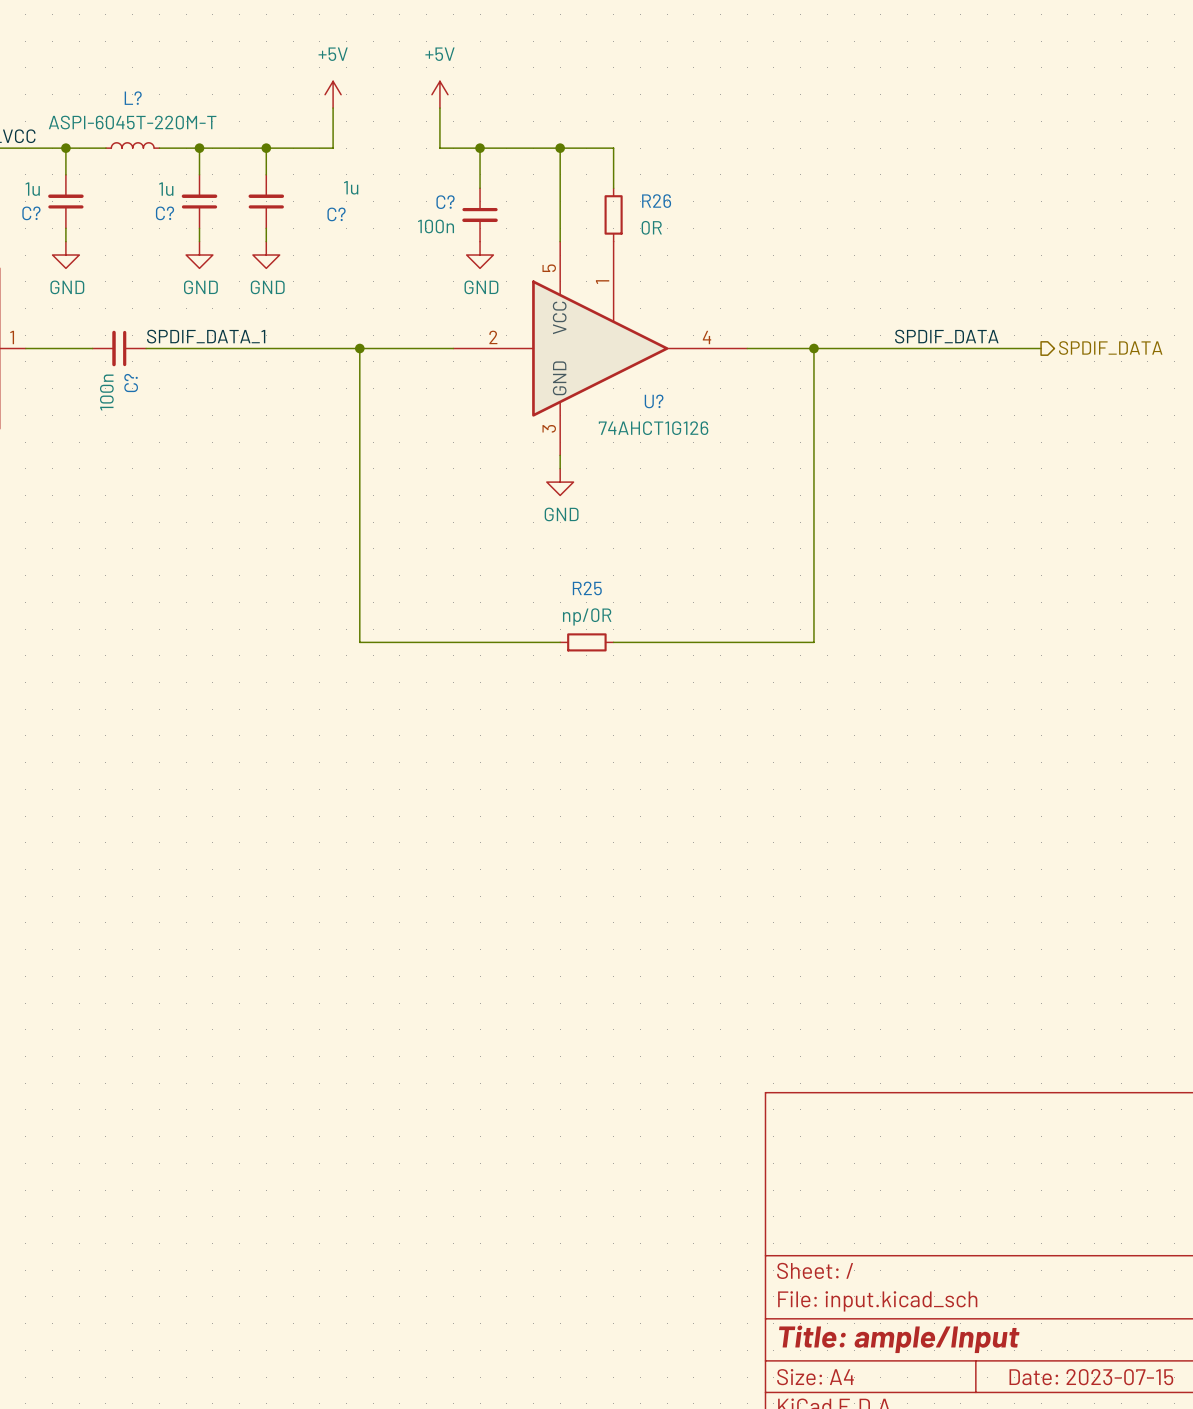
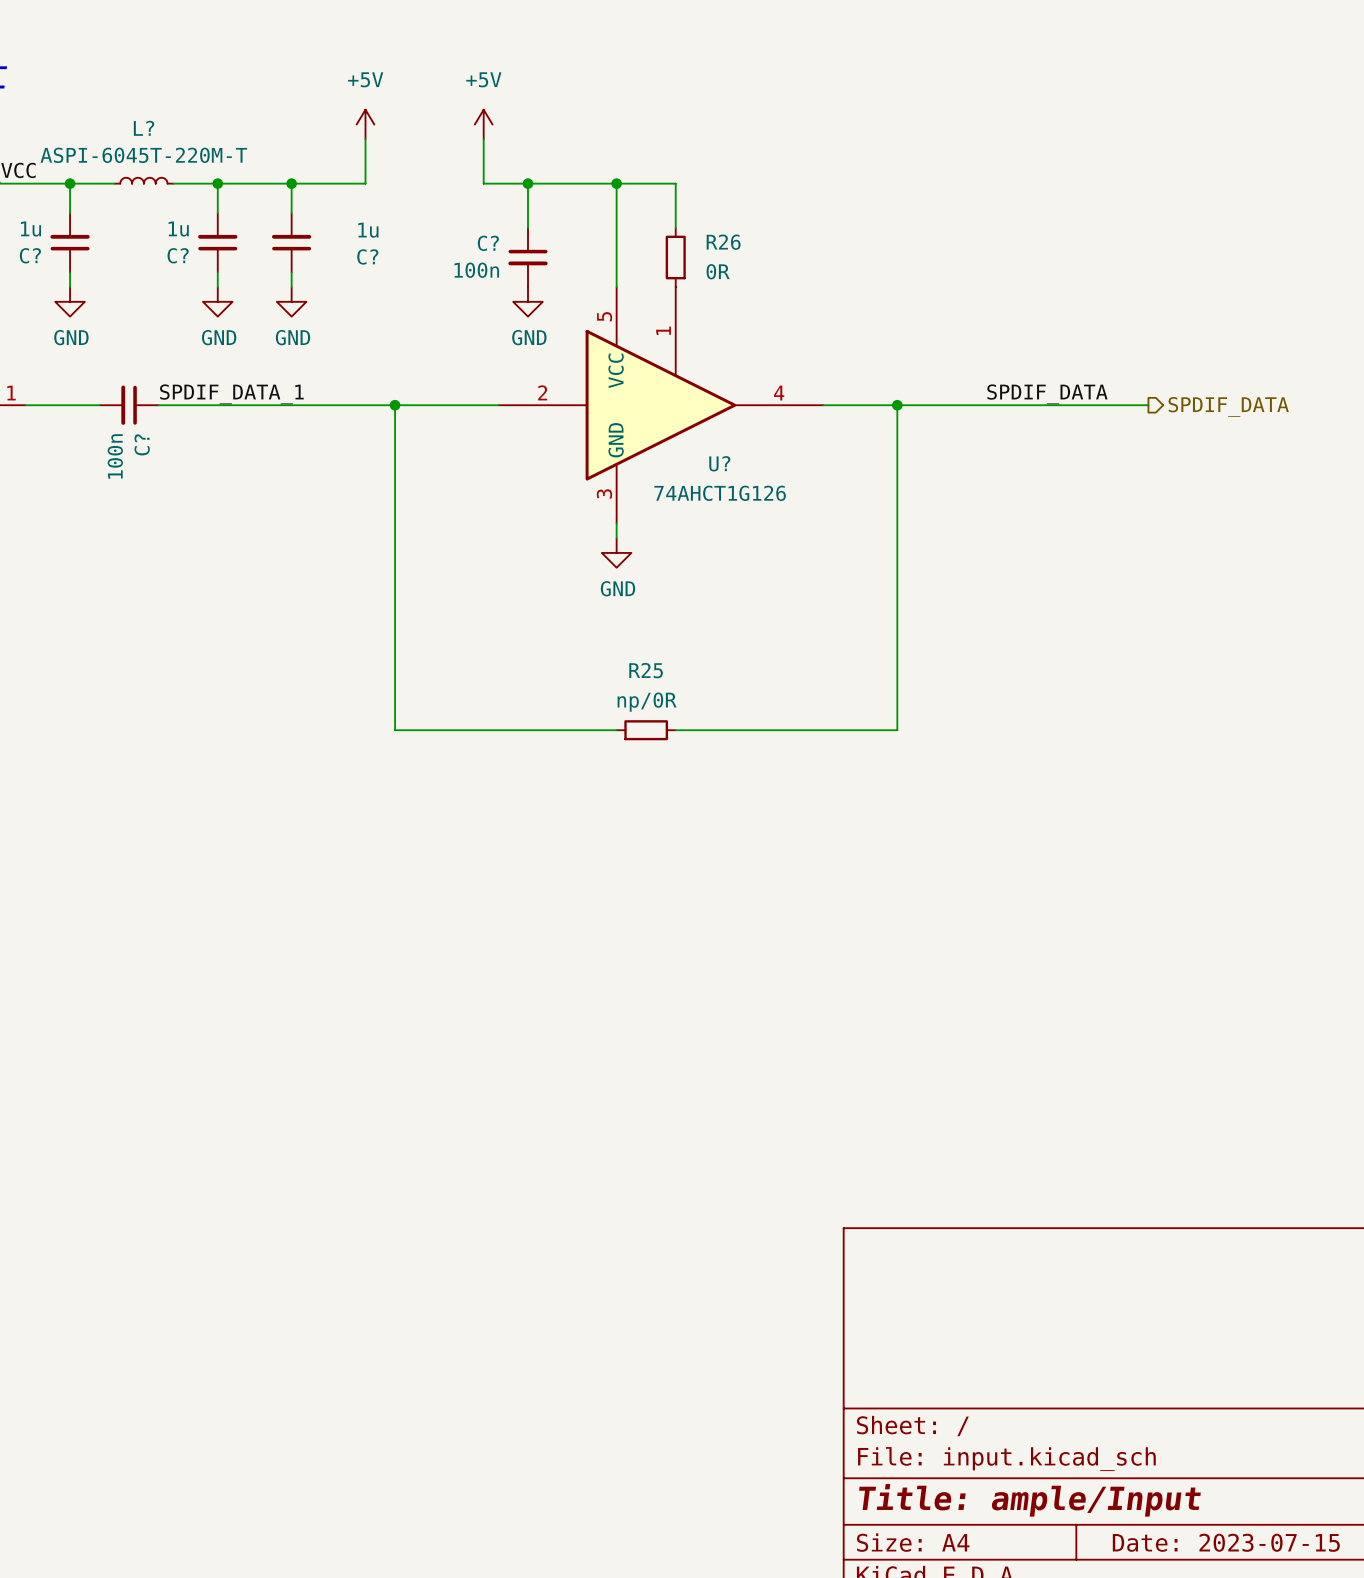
C? value position: 1u (351, 187) -> 1u (368, 230)

